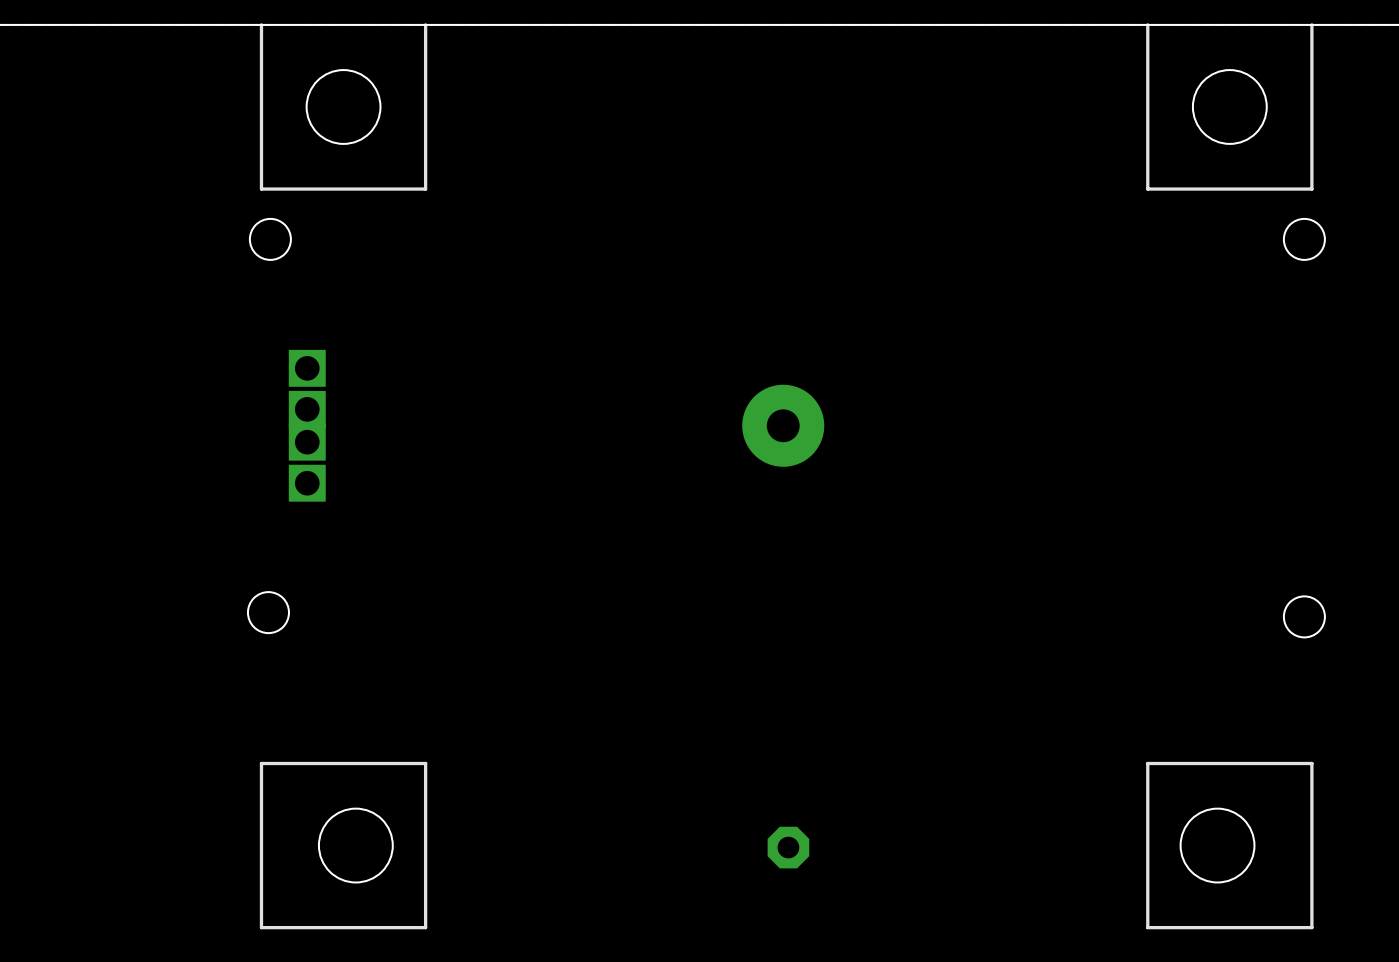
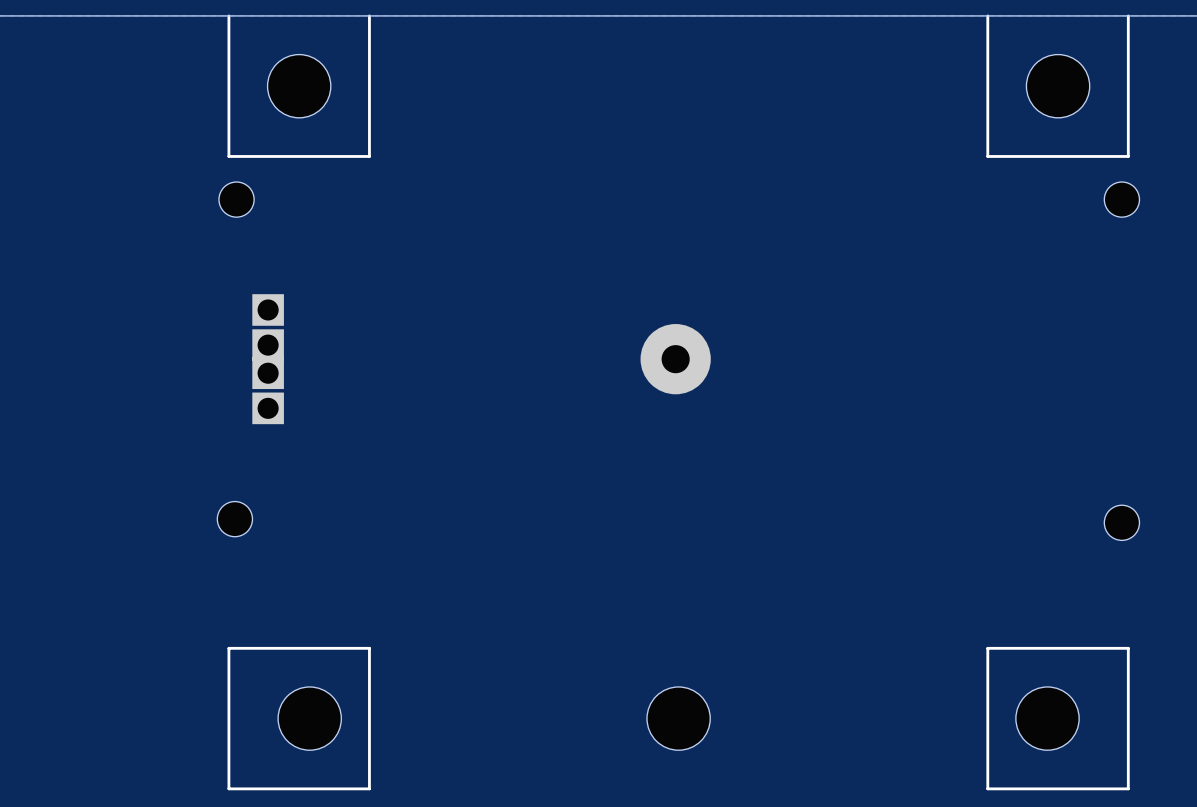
hole: none -> (678, 718)

